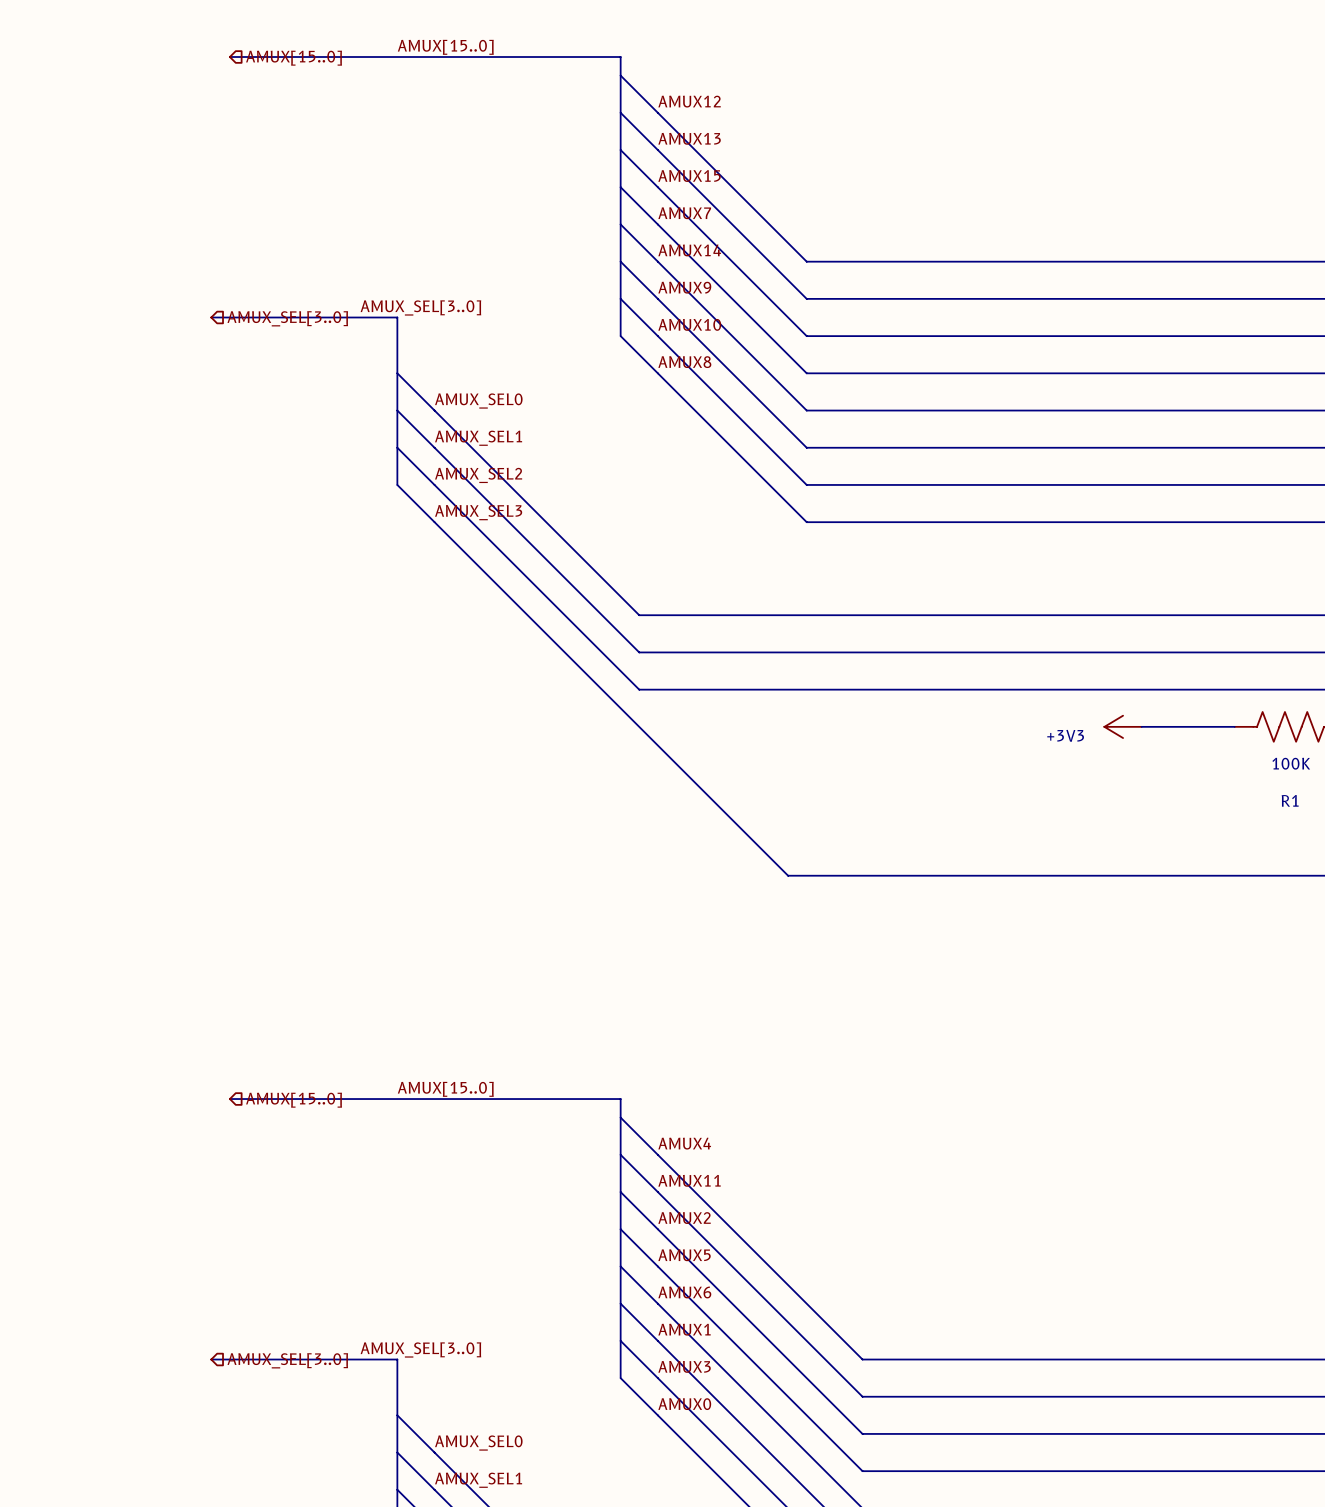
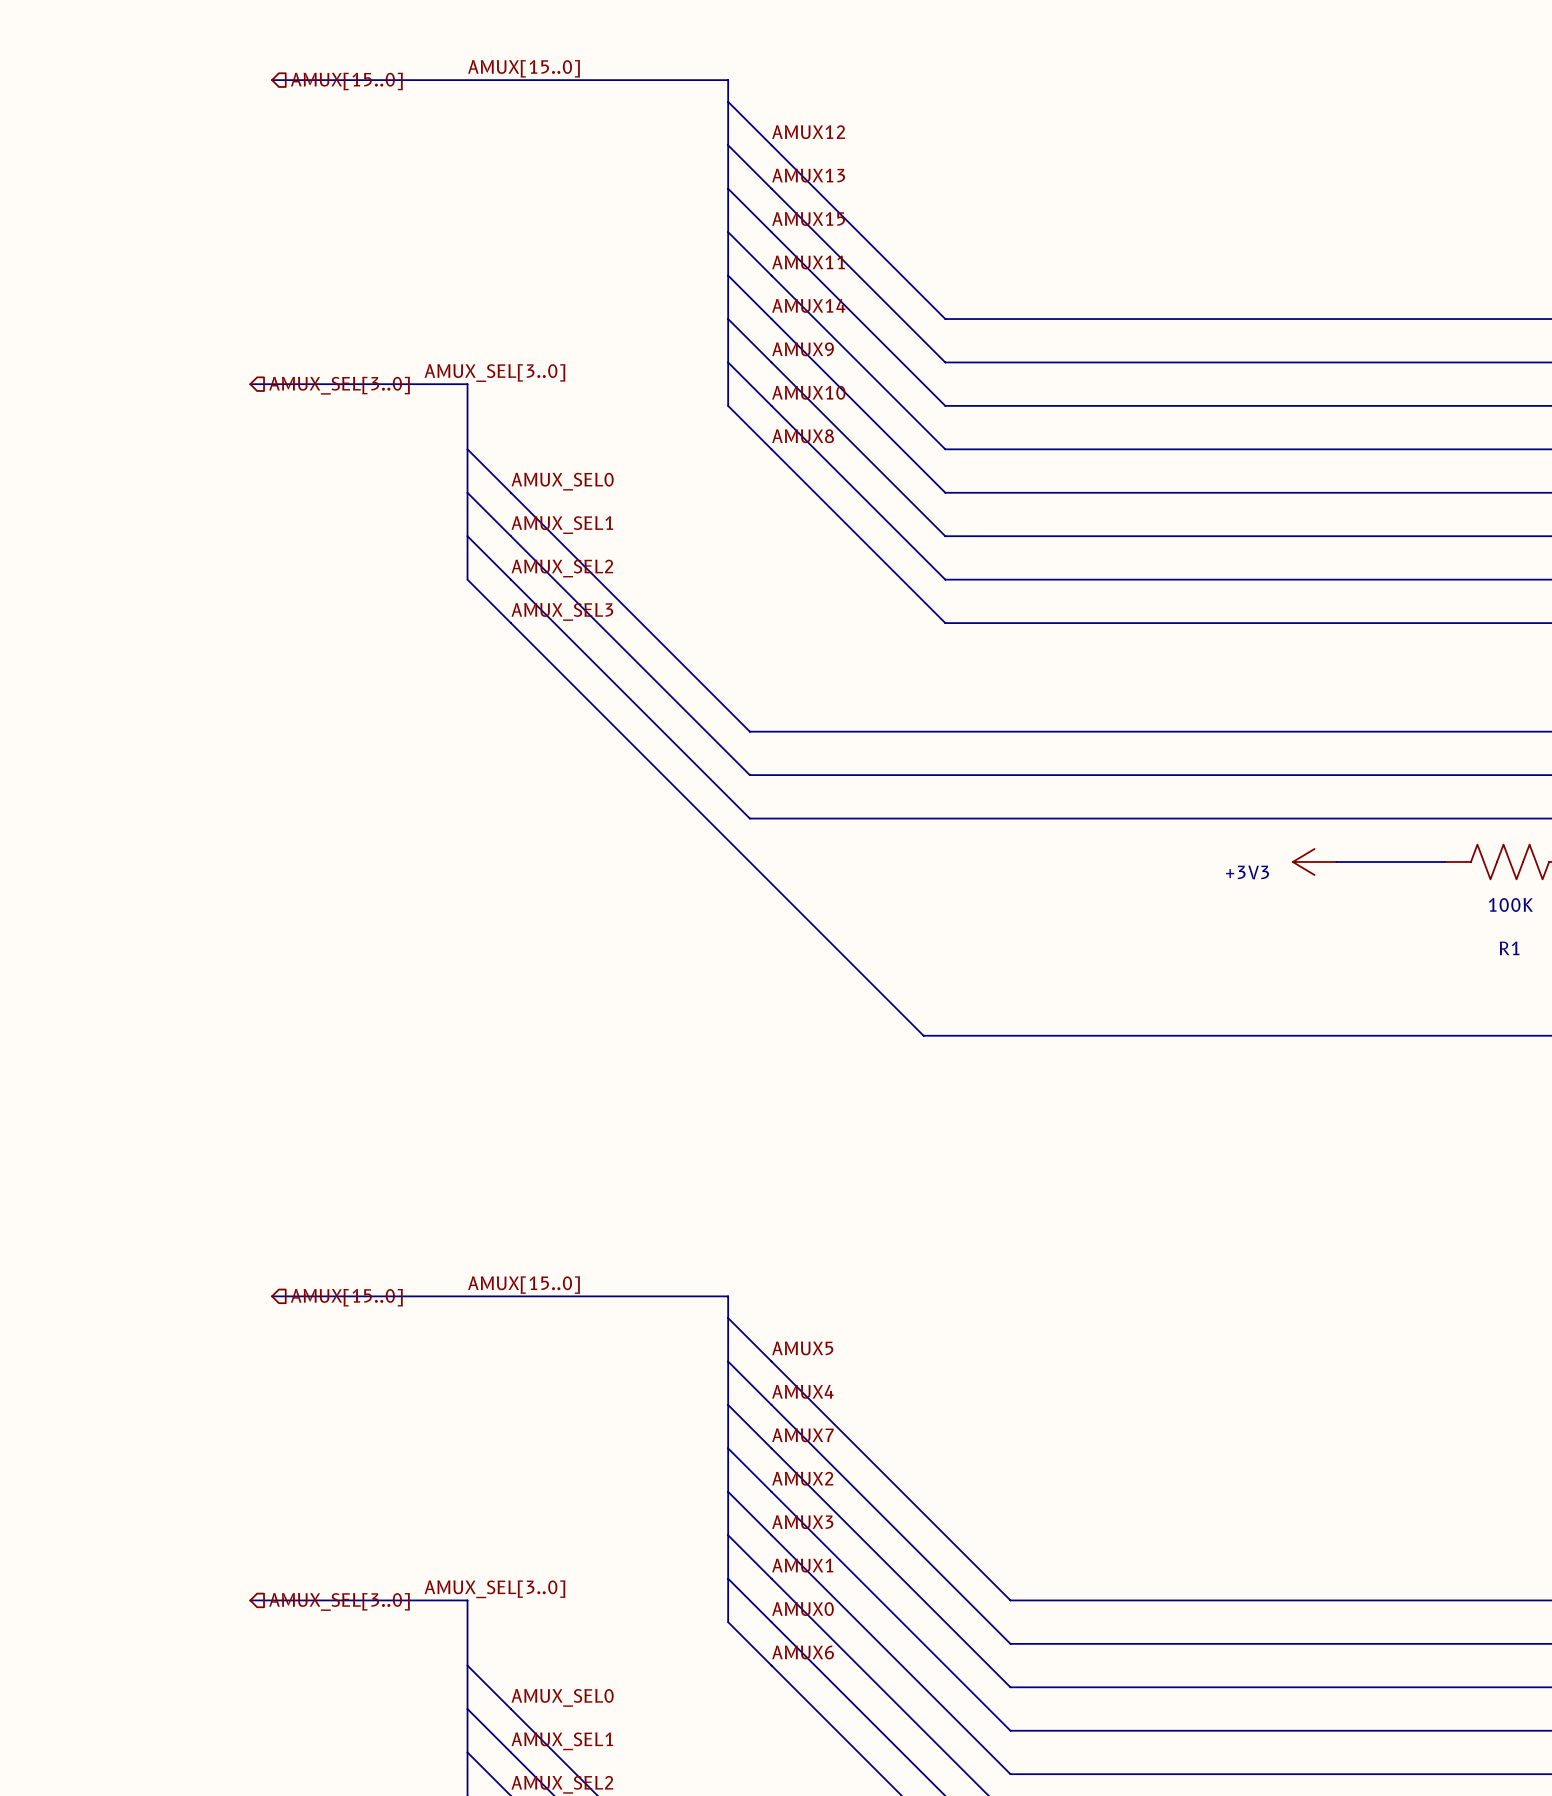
label: AMUX7 (684, 213) -> AMUX11 (808, 262)
label: AMUX4 (684, 1143) -> AMUX5 (802, 1348)
label: AMUX11 (689, 1180) -> AMUX4 (802, 1391)
label: AMUX2 (684, 1218) -> AMUX7 (802, 1435)
label: AMUX5 (684, 1255) -> AMUX2 (802, 1478)
label: AMUX6 (684, 1292) -> AMUX3 (802, 1522)
label: AMUX3 (684, 1366) -> AMUX0 (802, 1609)
label: AMUX0 (684, 1404) -> AMUX6 (803, 1652)

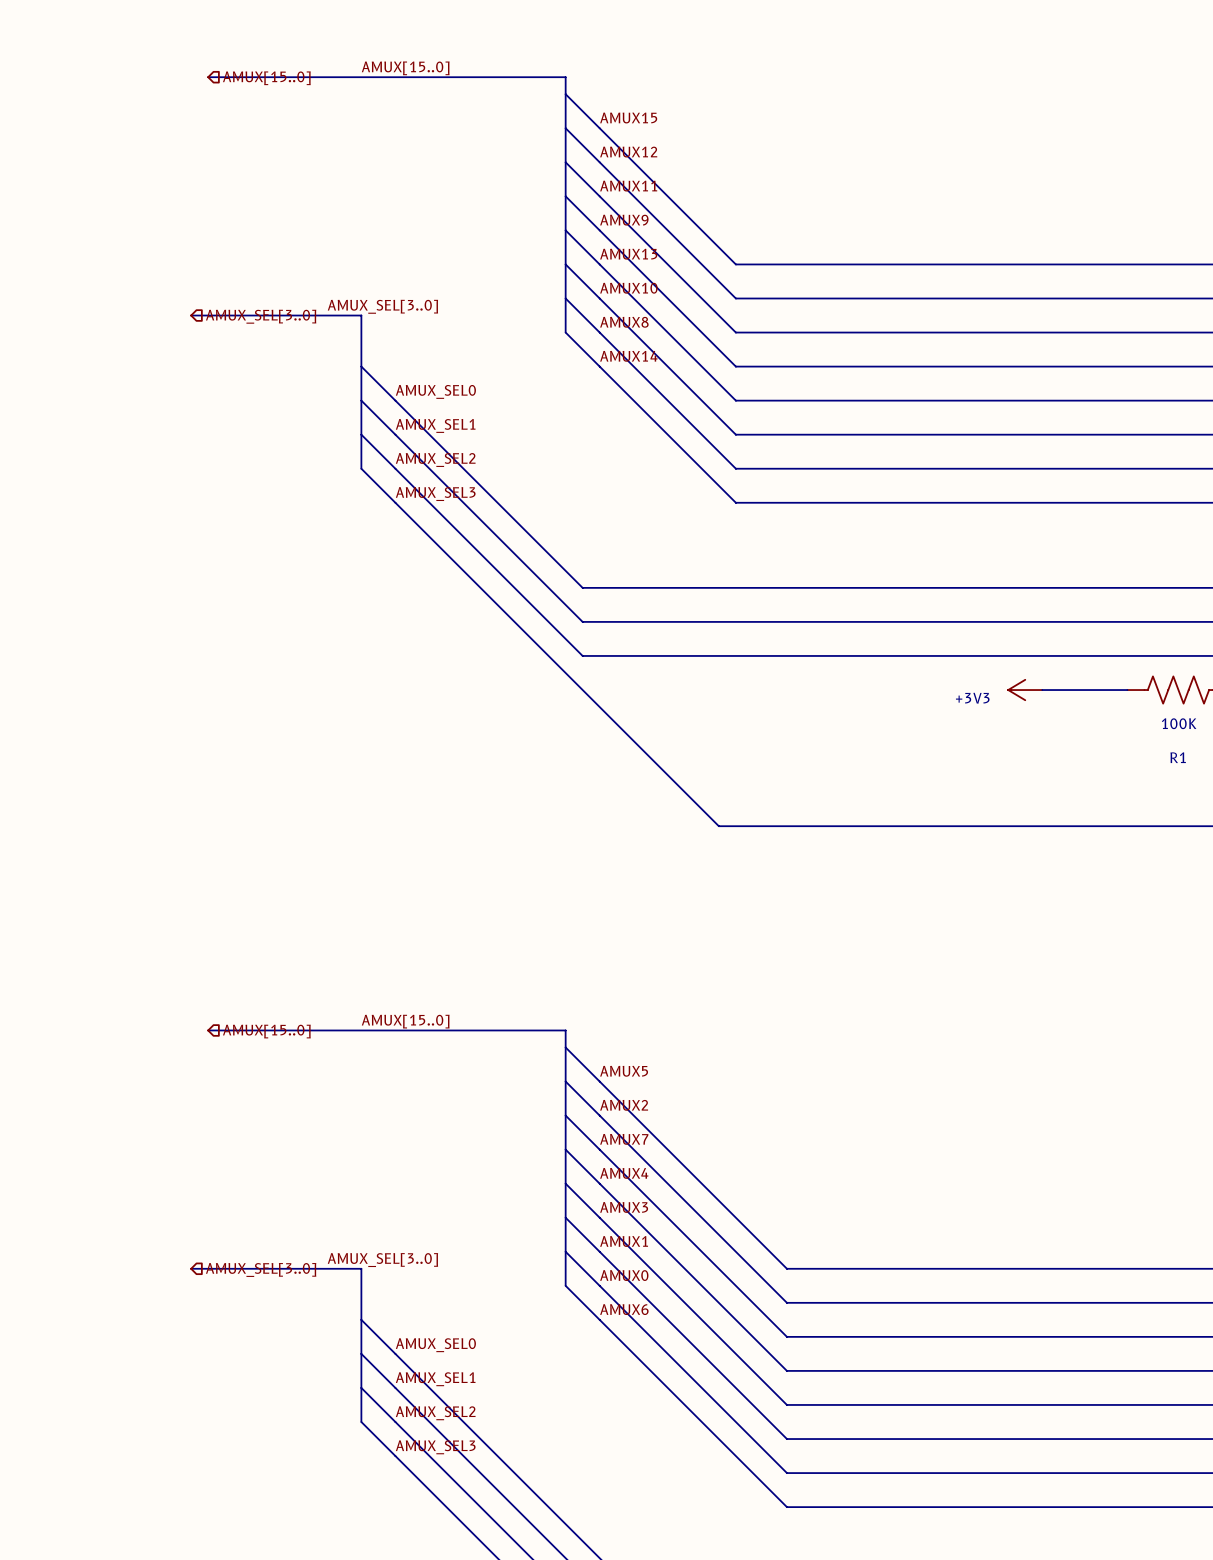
label: AMUX12 (808, 132) -> AMUX15 (628, 118)
label: AMUX13 (808, 175) -> AMUX12 (628, 152)
label: AMUX15 (808, 219) -> AMUX11 (628, 186)
label: AMUX11 (808, 262) -> AMUX9 (624, 220)
label: AMUX14 (808, 305) -> AMUX13 (628, 254)
label: AMUX9 (803, 349) -> AMUX10 (628, 288)
label: AMUX10 (808, 392) -> AMUX8 (624, 322)
label: AMUX8 (803, 436) -> AMUX14 (628, 356)
label: AMUX4 (802, 1391) -> AMUX2 (624, 1105)
label: AMUX2 (802, 1478) -> AMUX4 (624, 1173)

